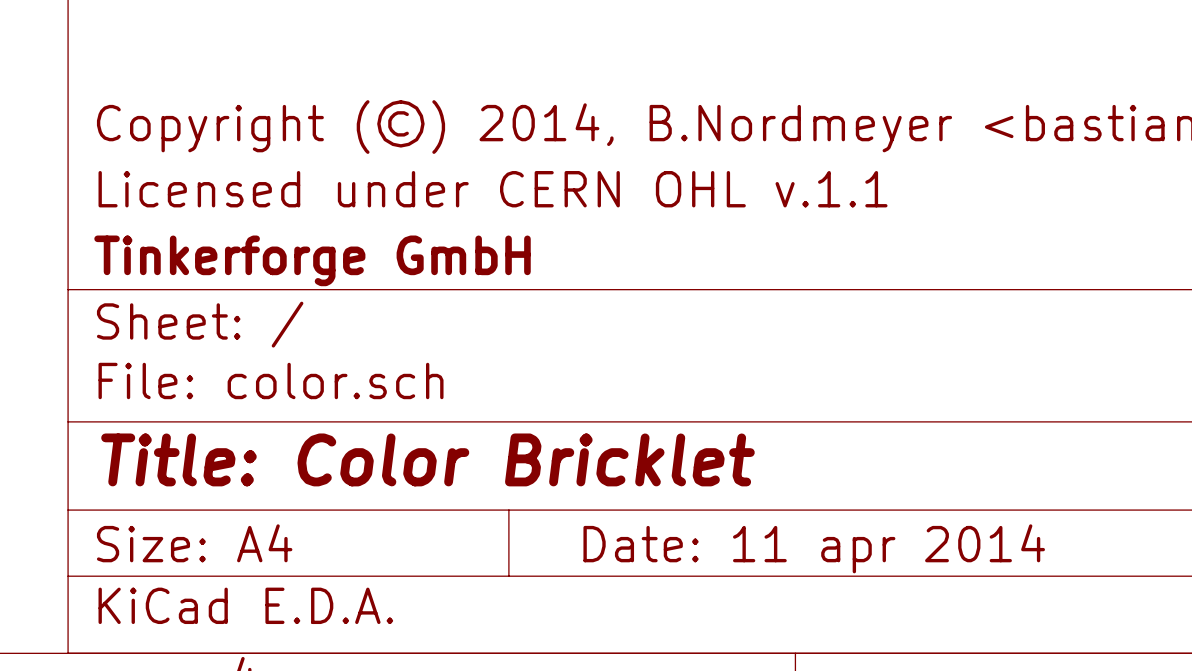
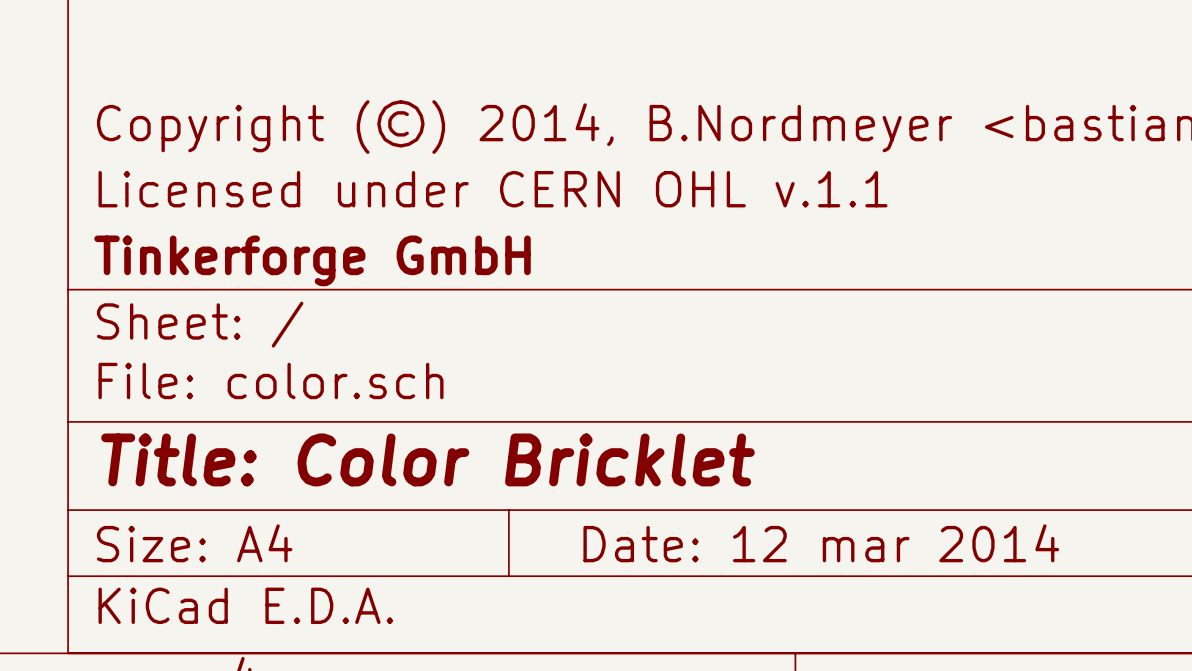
title block: Date: 11 apr 2014 (814, 548) -> Date: 12 mar 2014 (821, 543)

